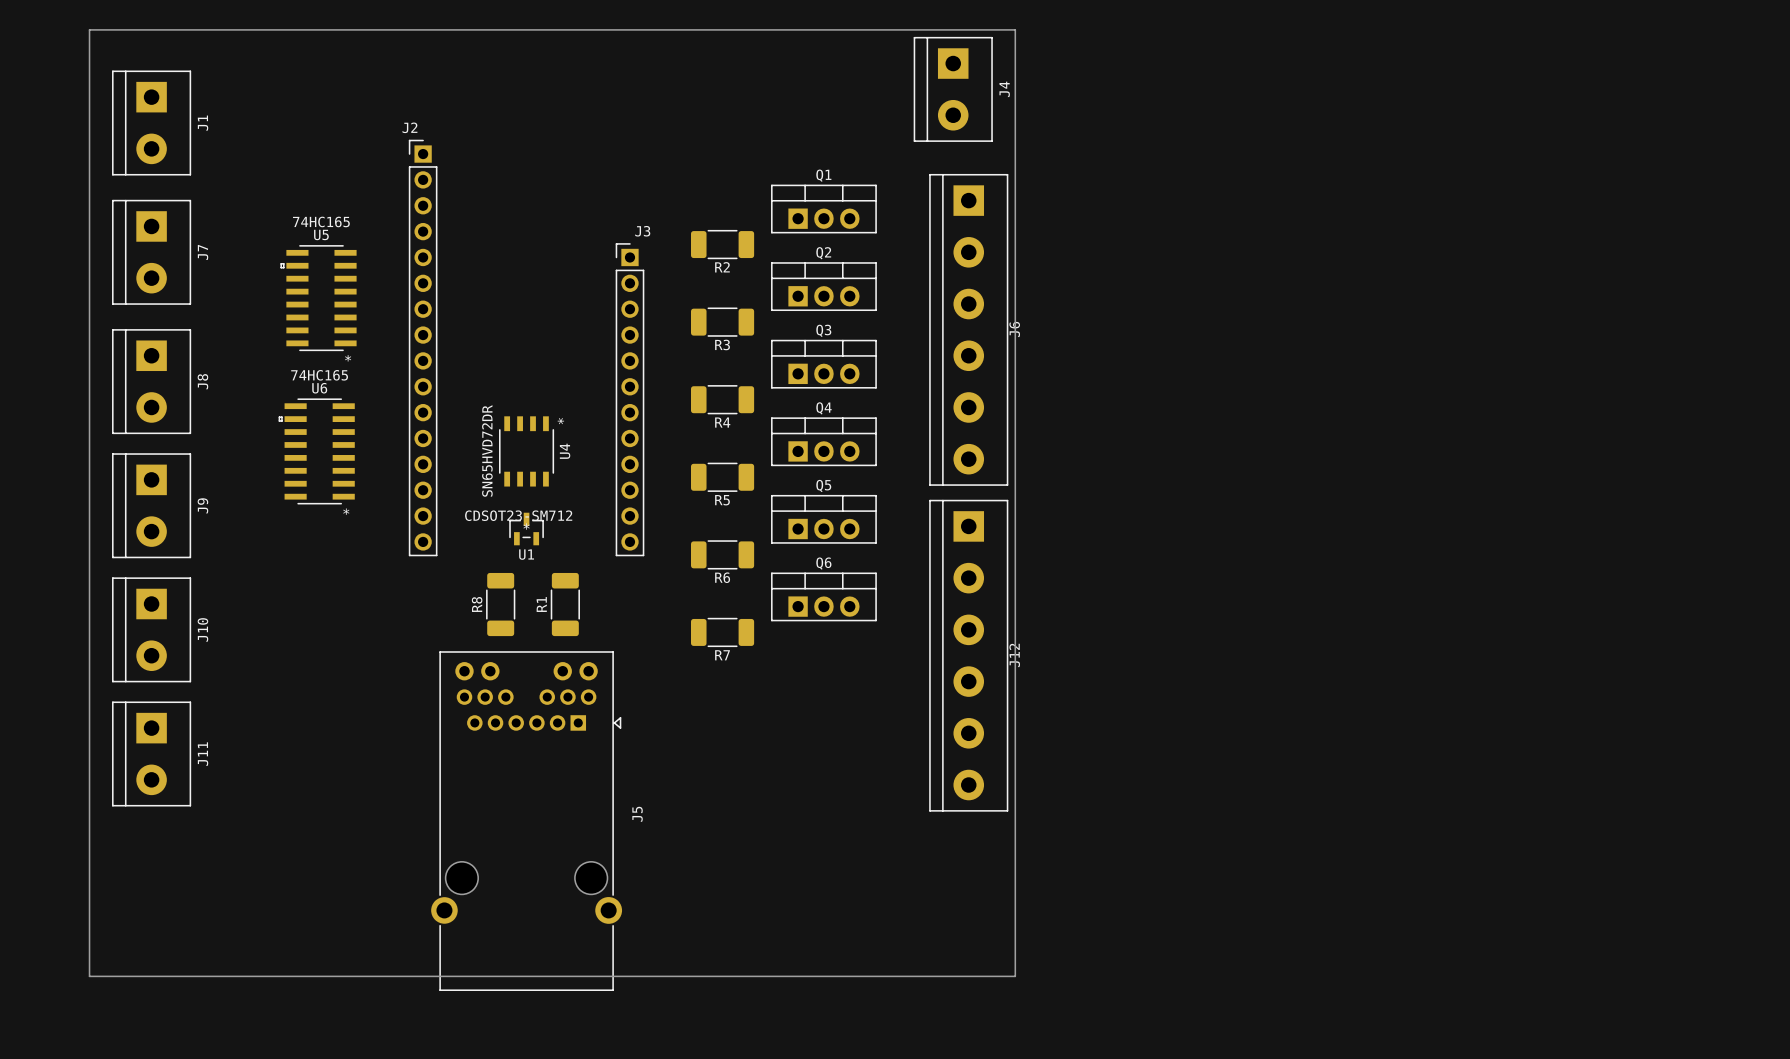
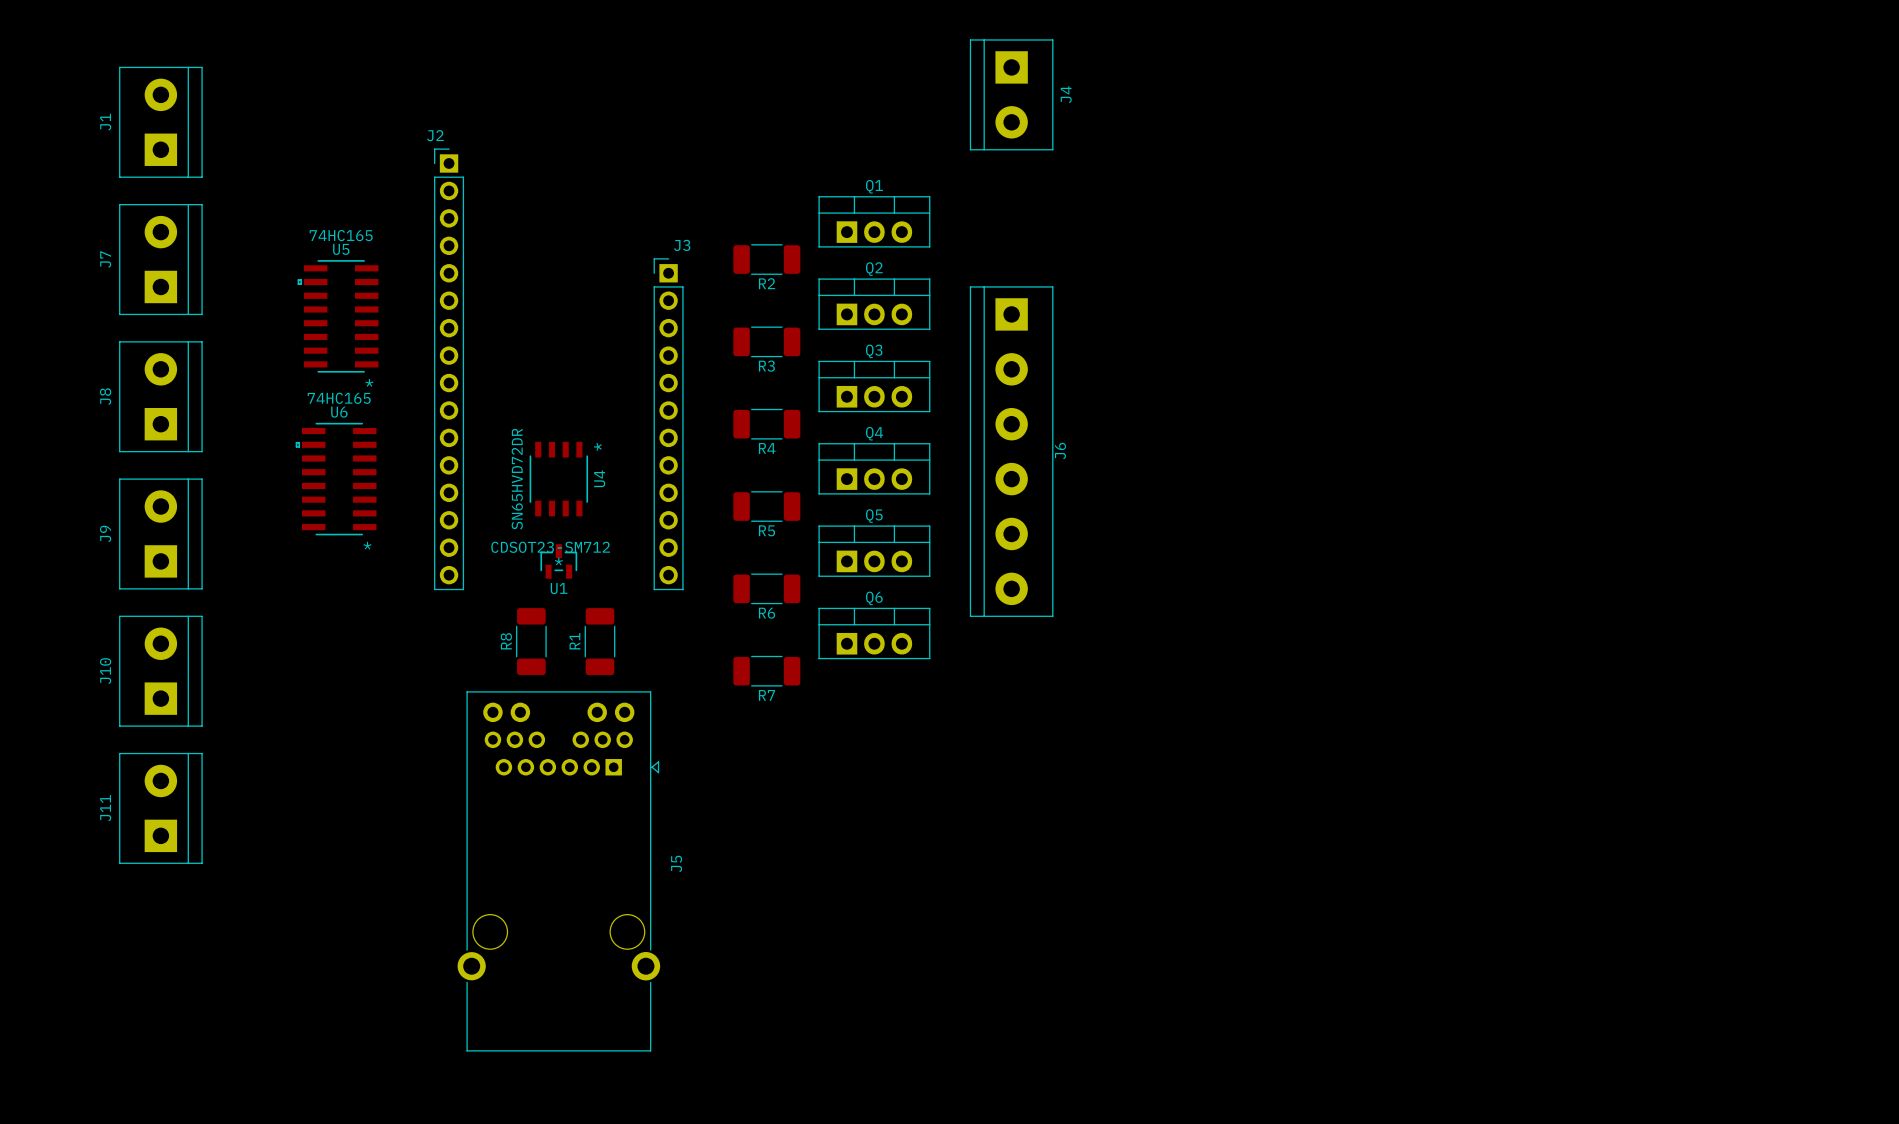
board edge: (89, 29) (1015, 29) (1015, 976) (89, 976) (89, 29) -> none
J1 rotation: 0° (151, 123) -> 180° (160, 122)
J7 rotation: 0° (151, 252) -> 180° (160, 259)
J6 position: (968, 329) -> (1011, 451)
J8 rotation: 0° (151, 381) -> 180° (160, 396)
J9 rotation: 0° (151, 505) -> 180° (160, 533)
J10 rotation: 0° (151, 629) -> 180° (160, 671)
J12: (968, 655) -> none
J11 rotation: 0° (151, 753) -> 180° (160, 808)

